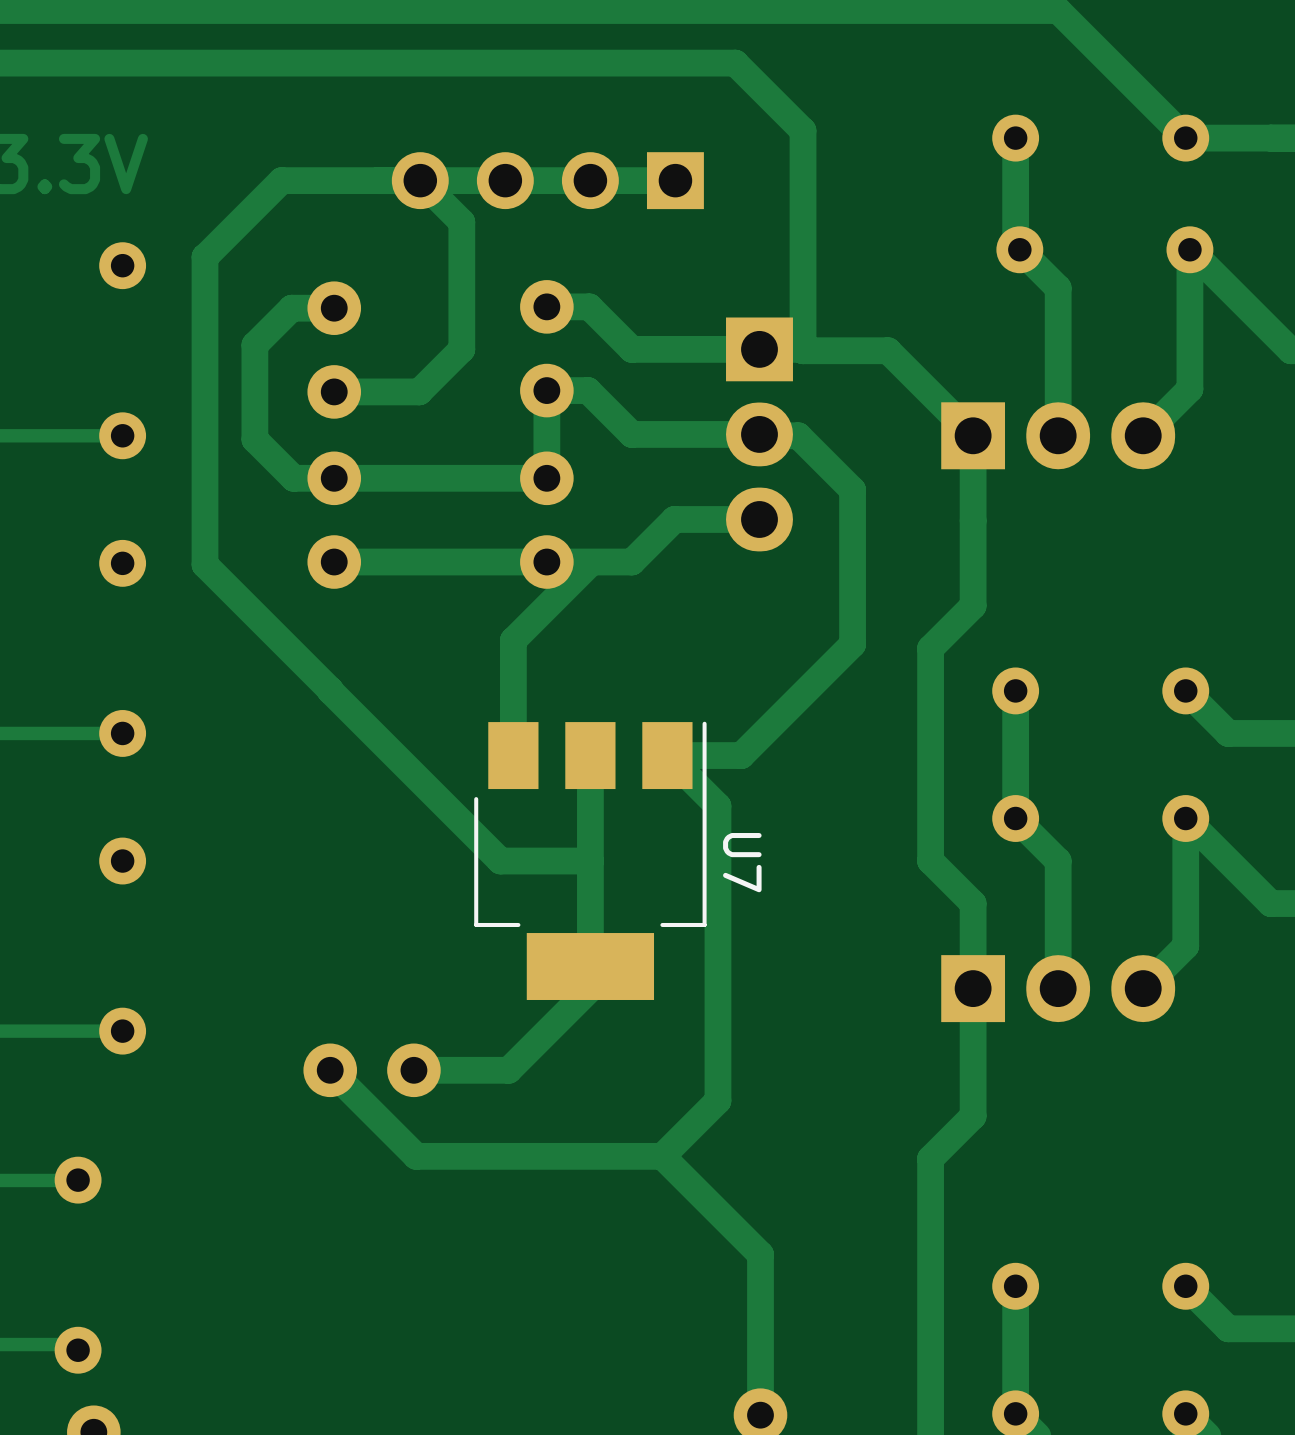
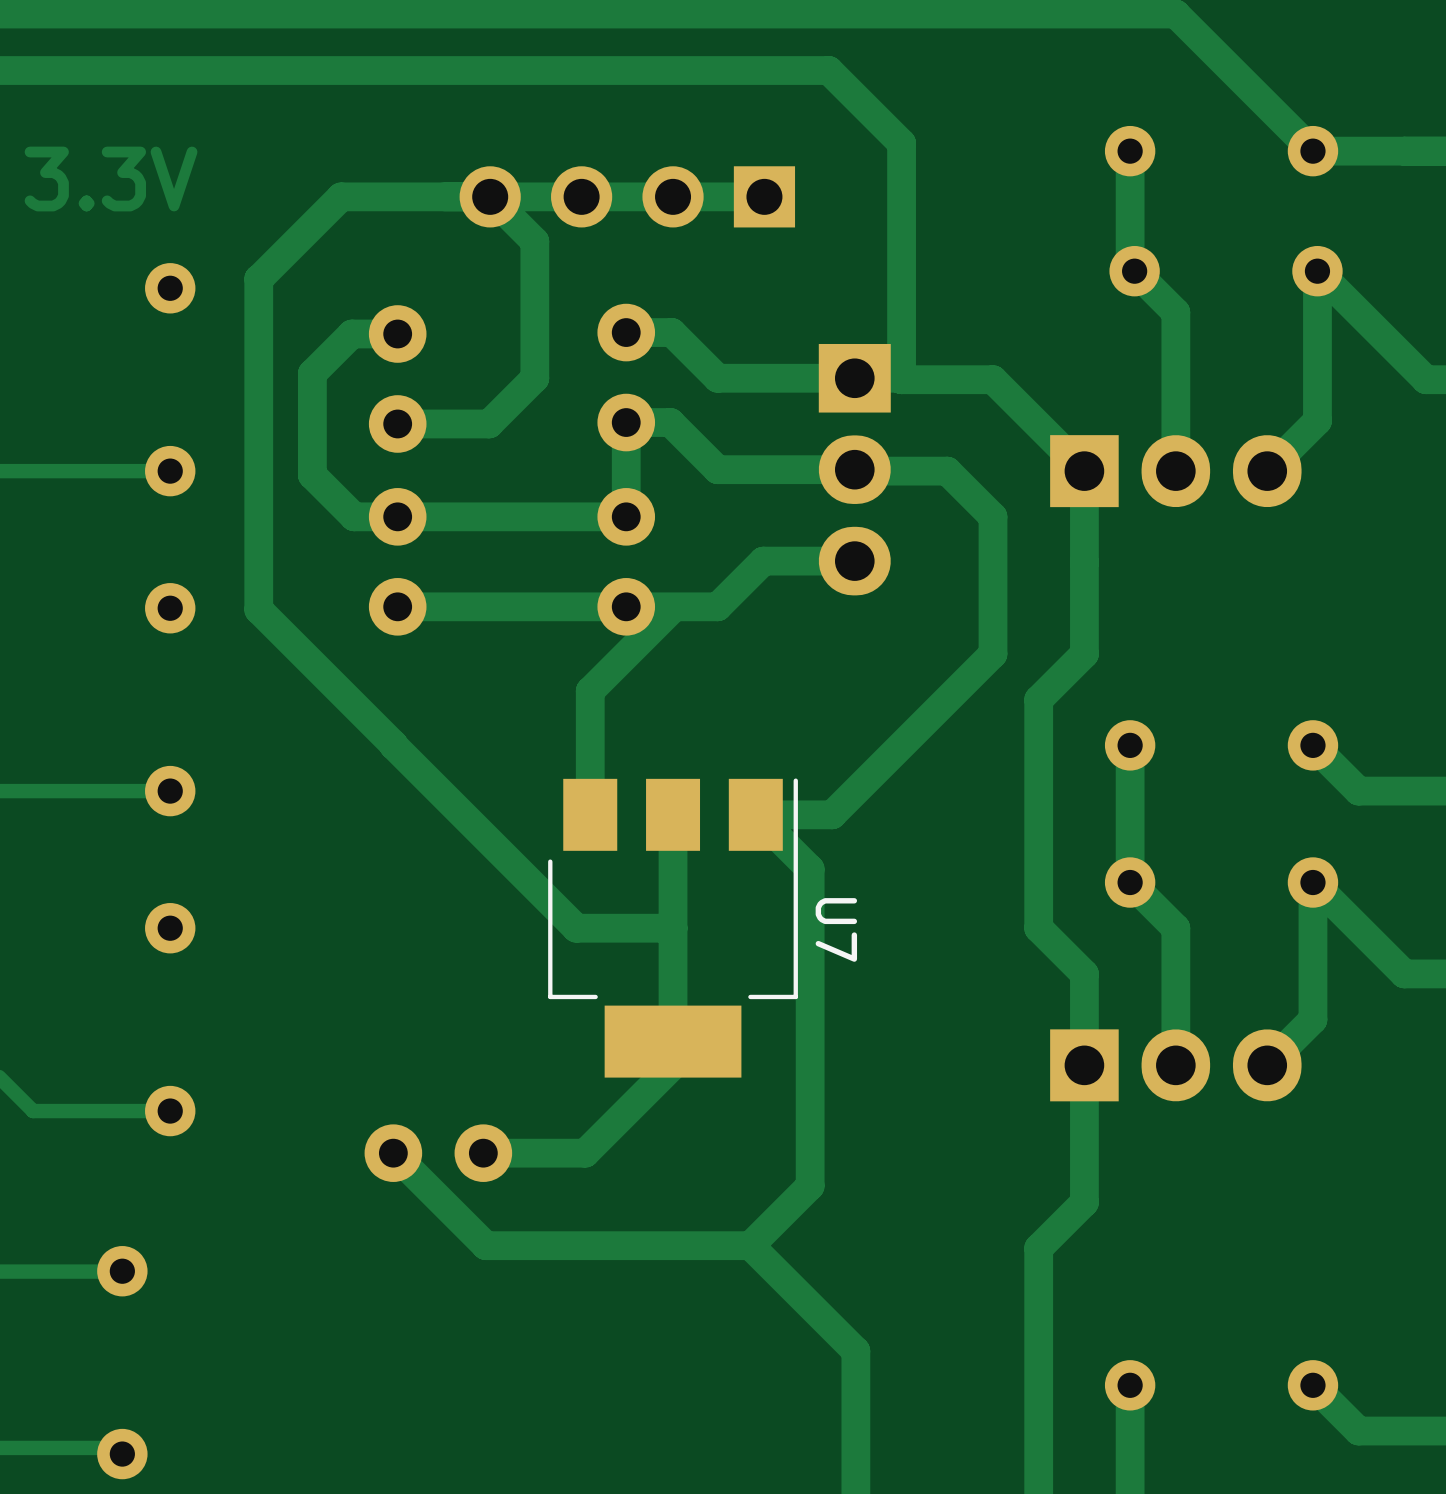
track: (798, 435) (852, 490) (852, 644) (741, 755) (738, 755) -> (896, 471) (947, 471) (993, 516) (993, 653) (832, 814)

